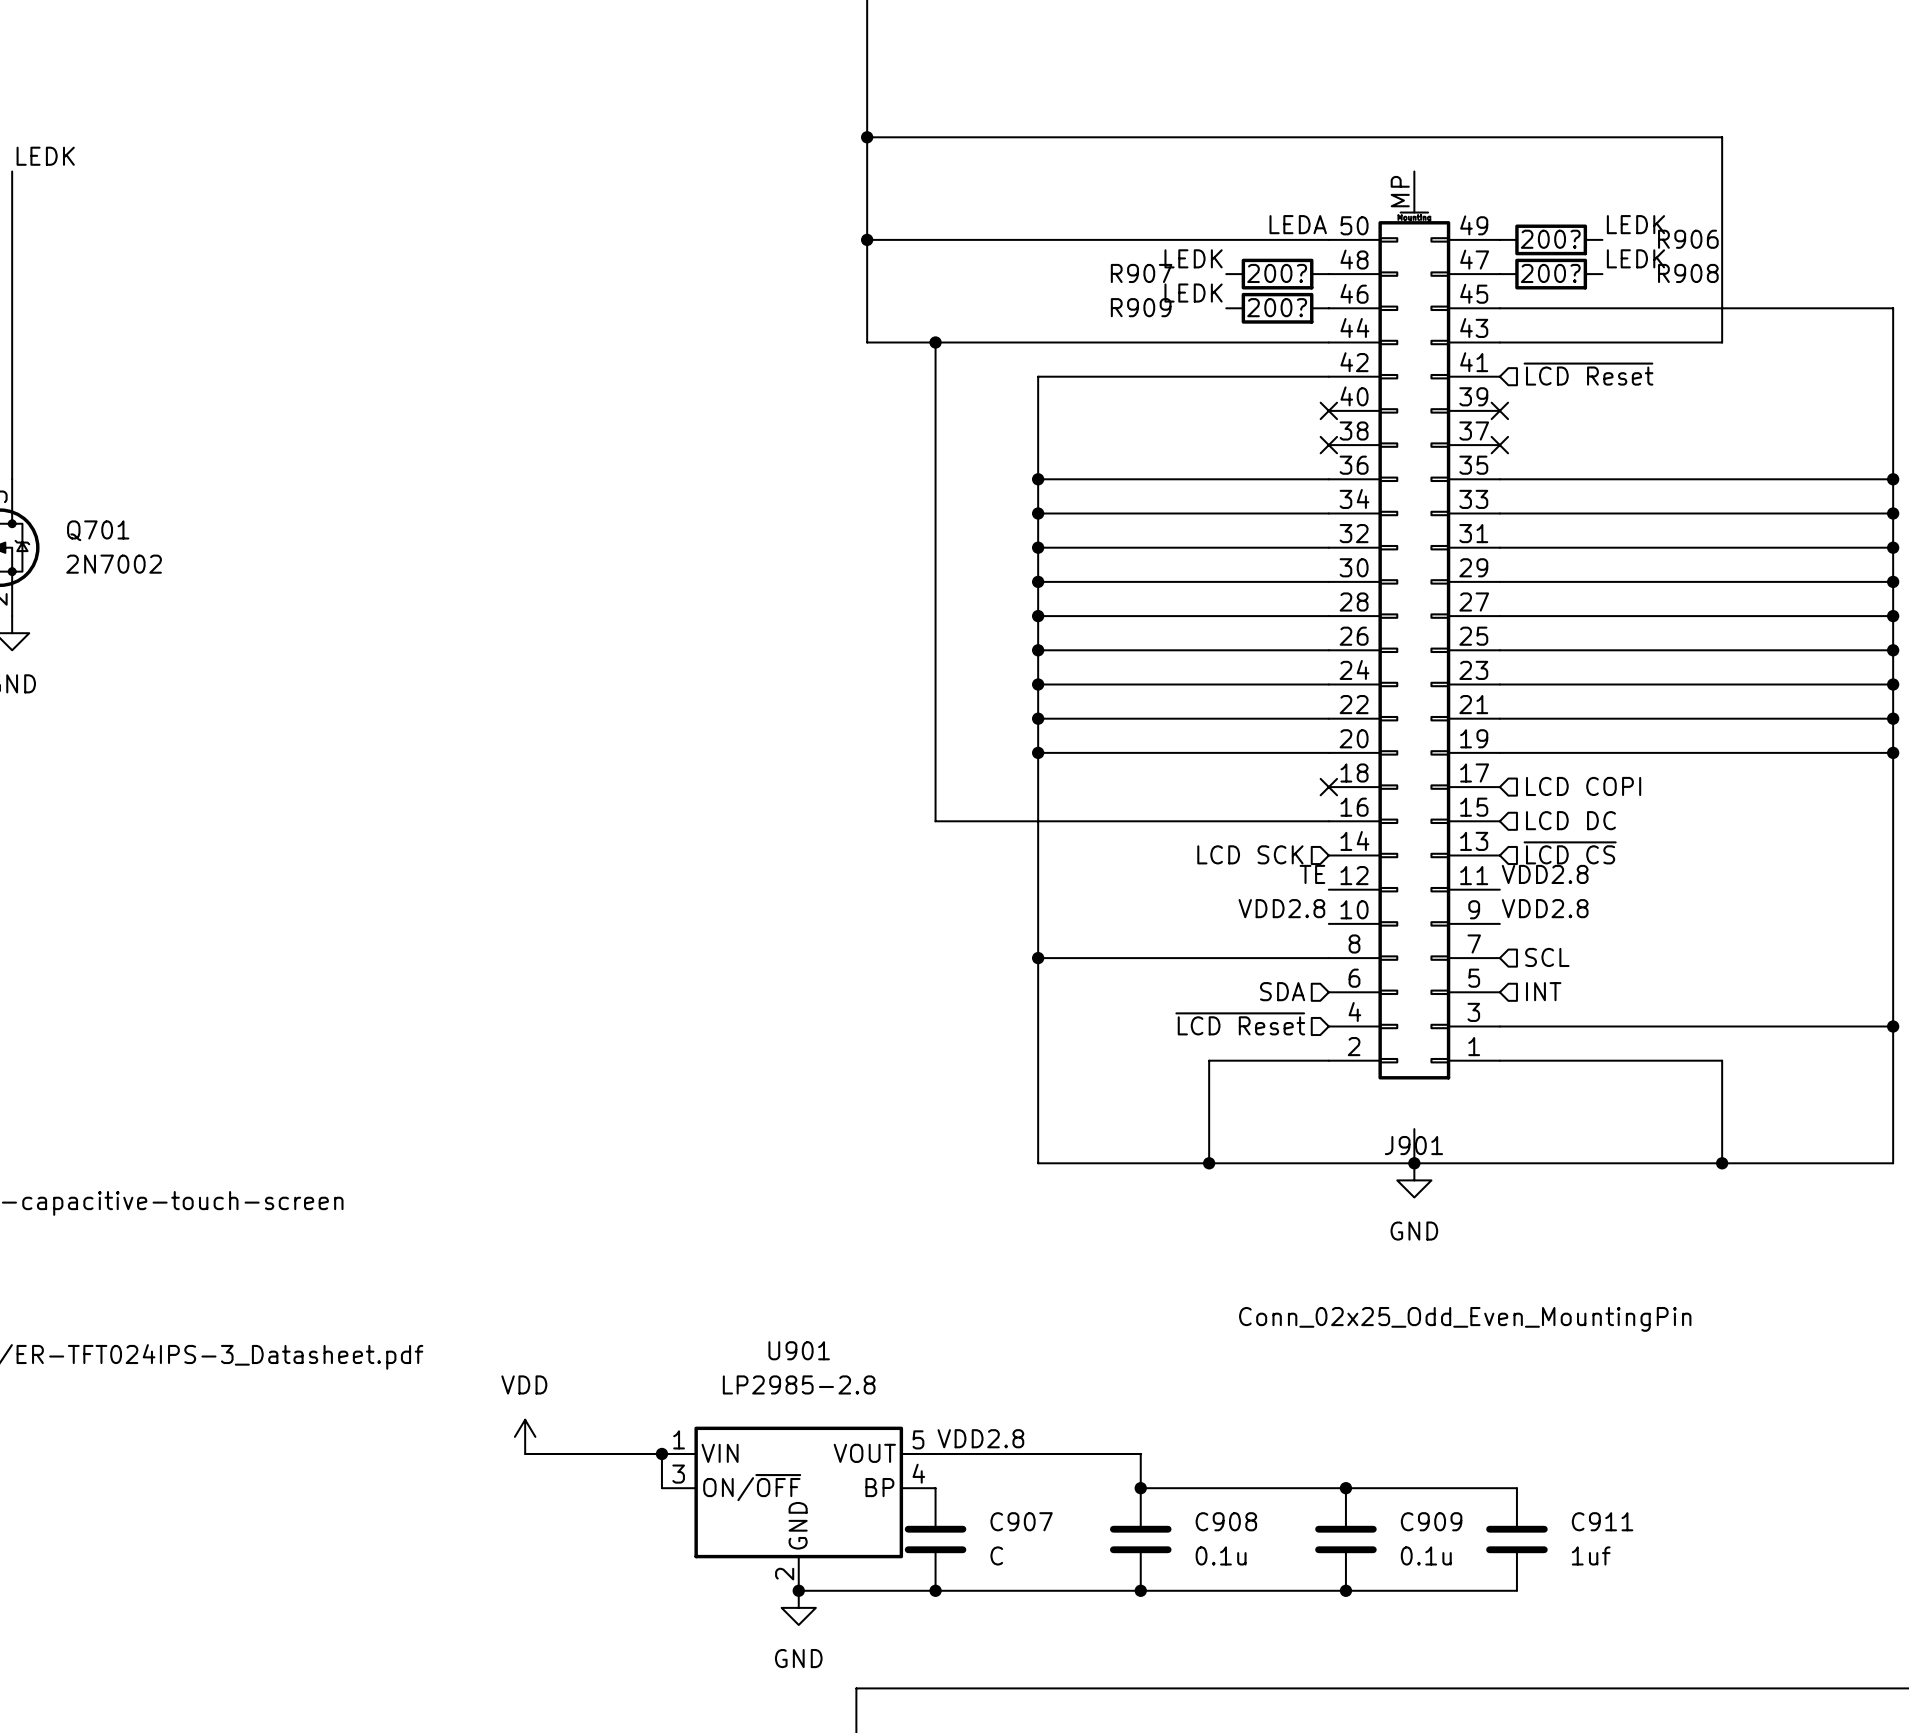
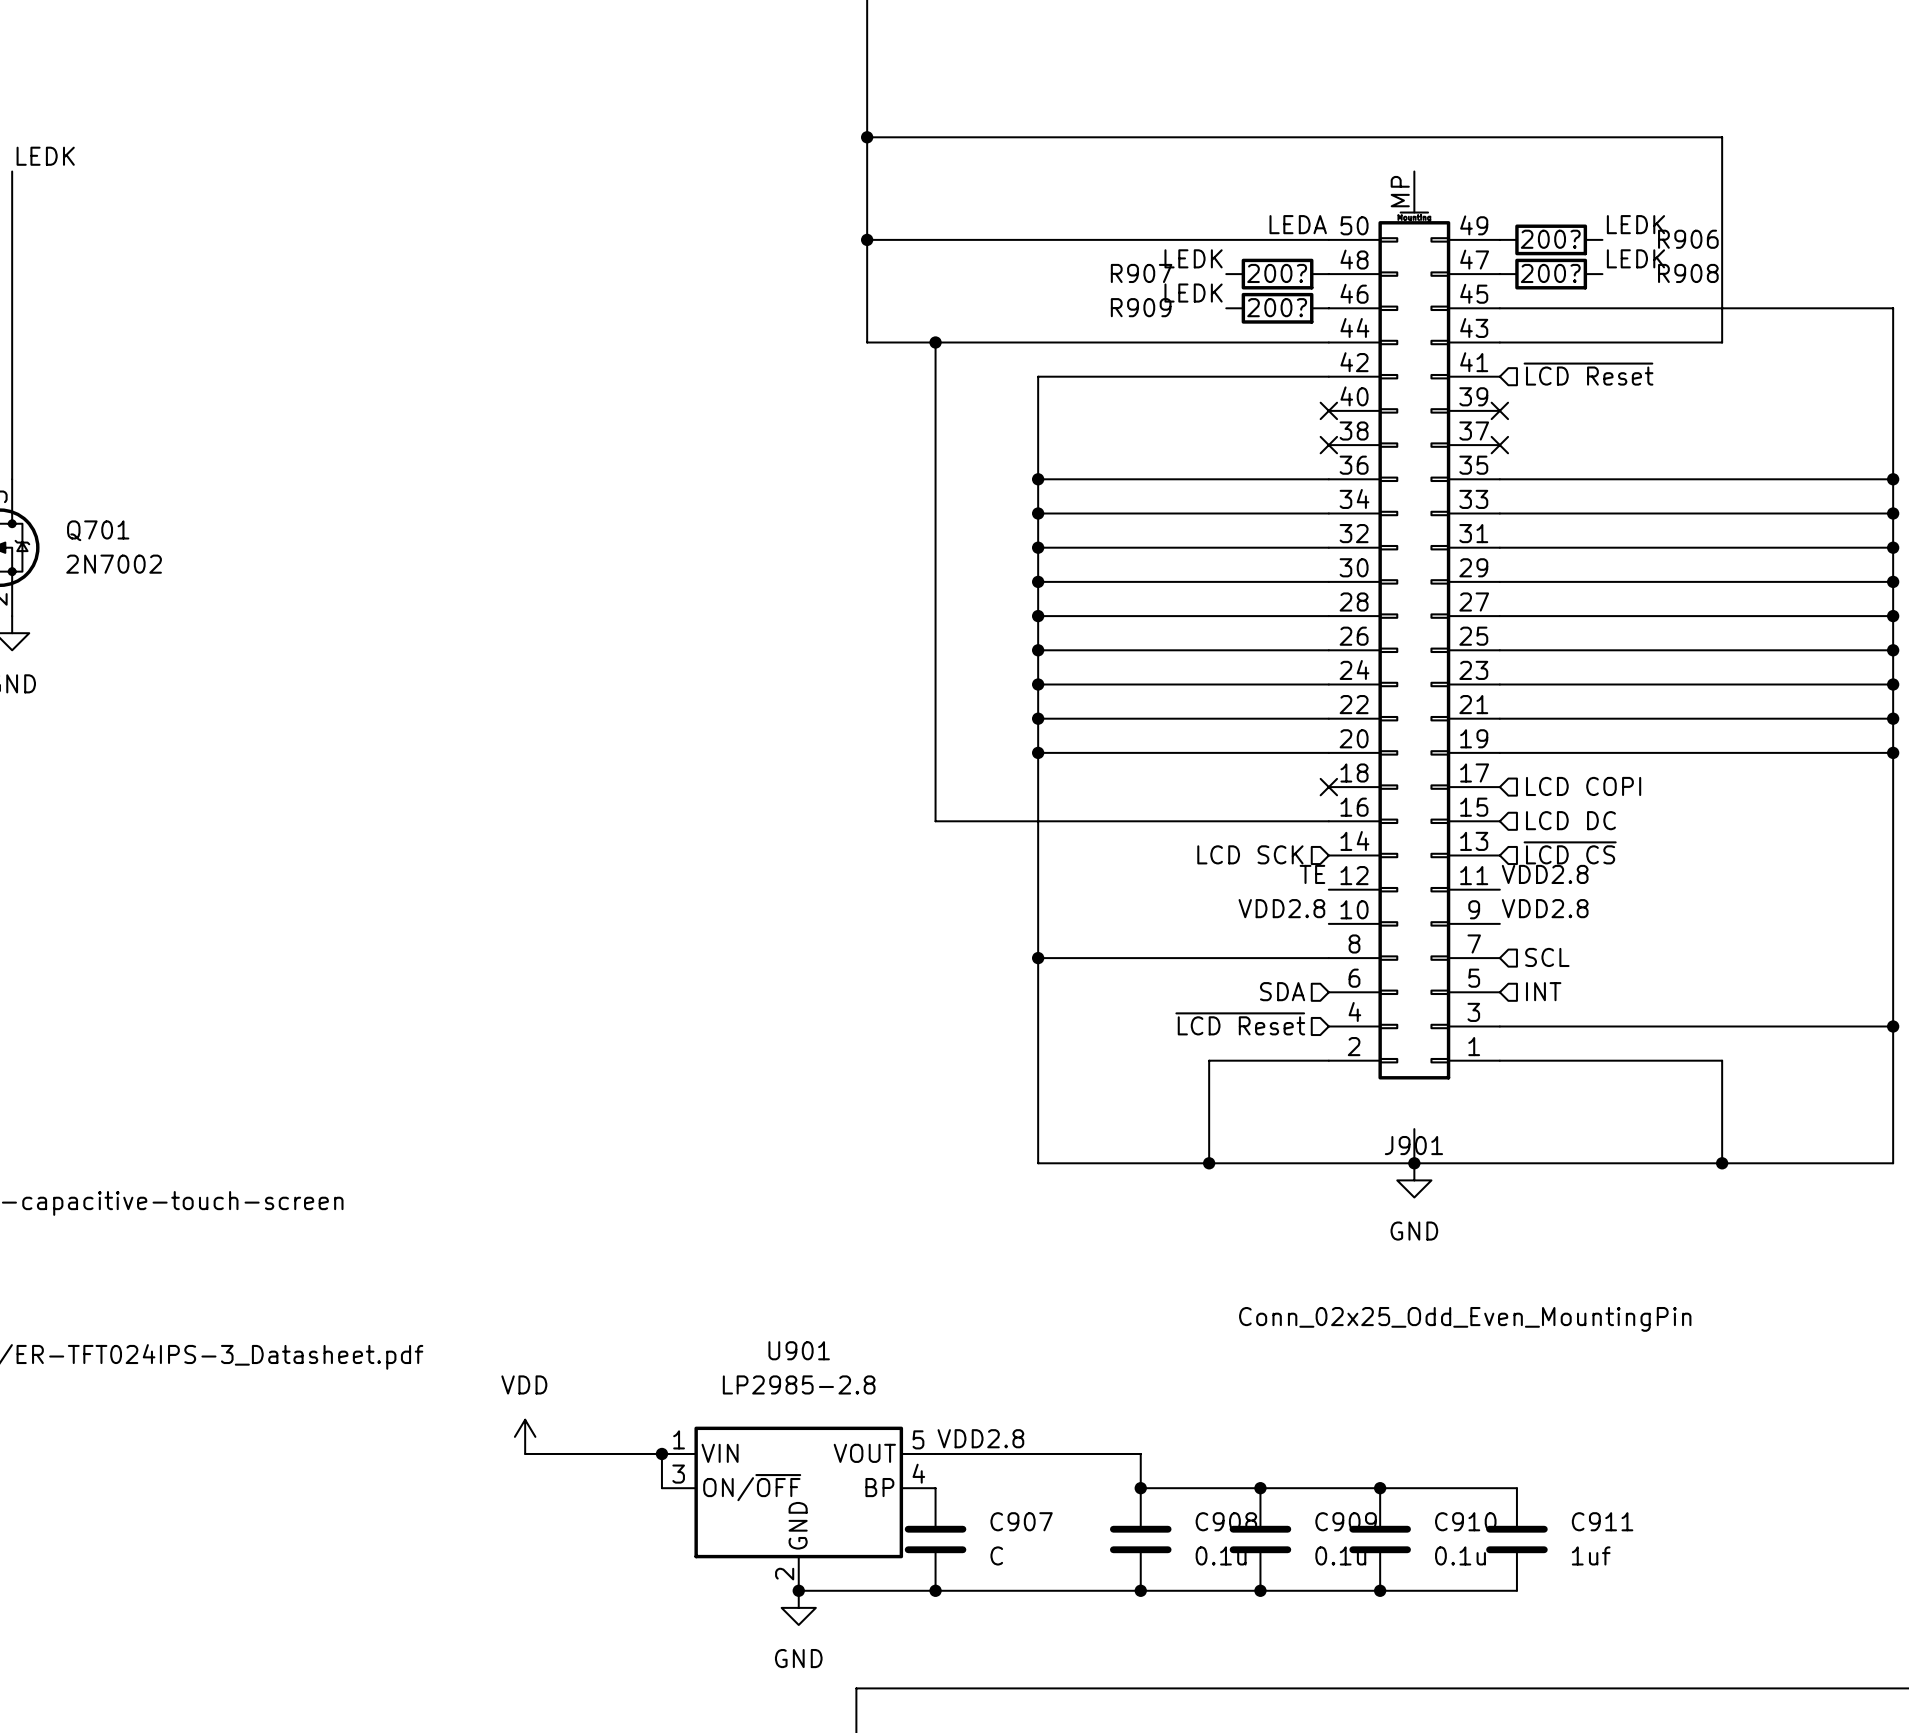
junction: none -> (1260, 1488)
junction position: (1345, 1488) -> (1380, 1488)
C909 position: (1345, 1539) -> (1260, 1539)
C910: none -> 0.1u (1380, 1539)
junction: none -> (1260, 1590)
junction position: (1345, 1590) -> (1380, 1590)

